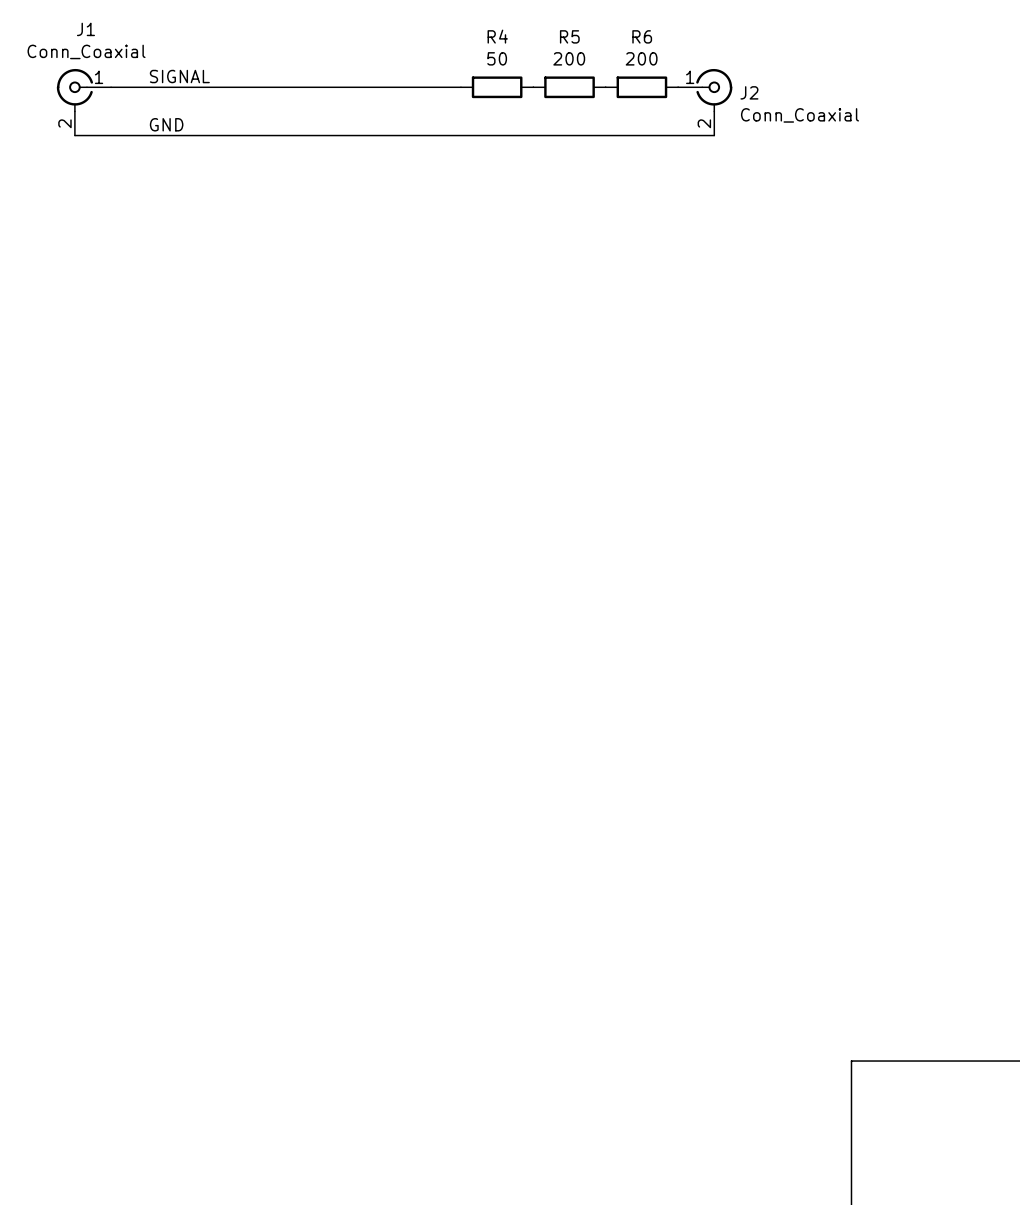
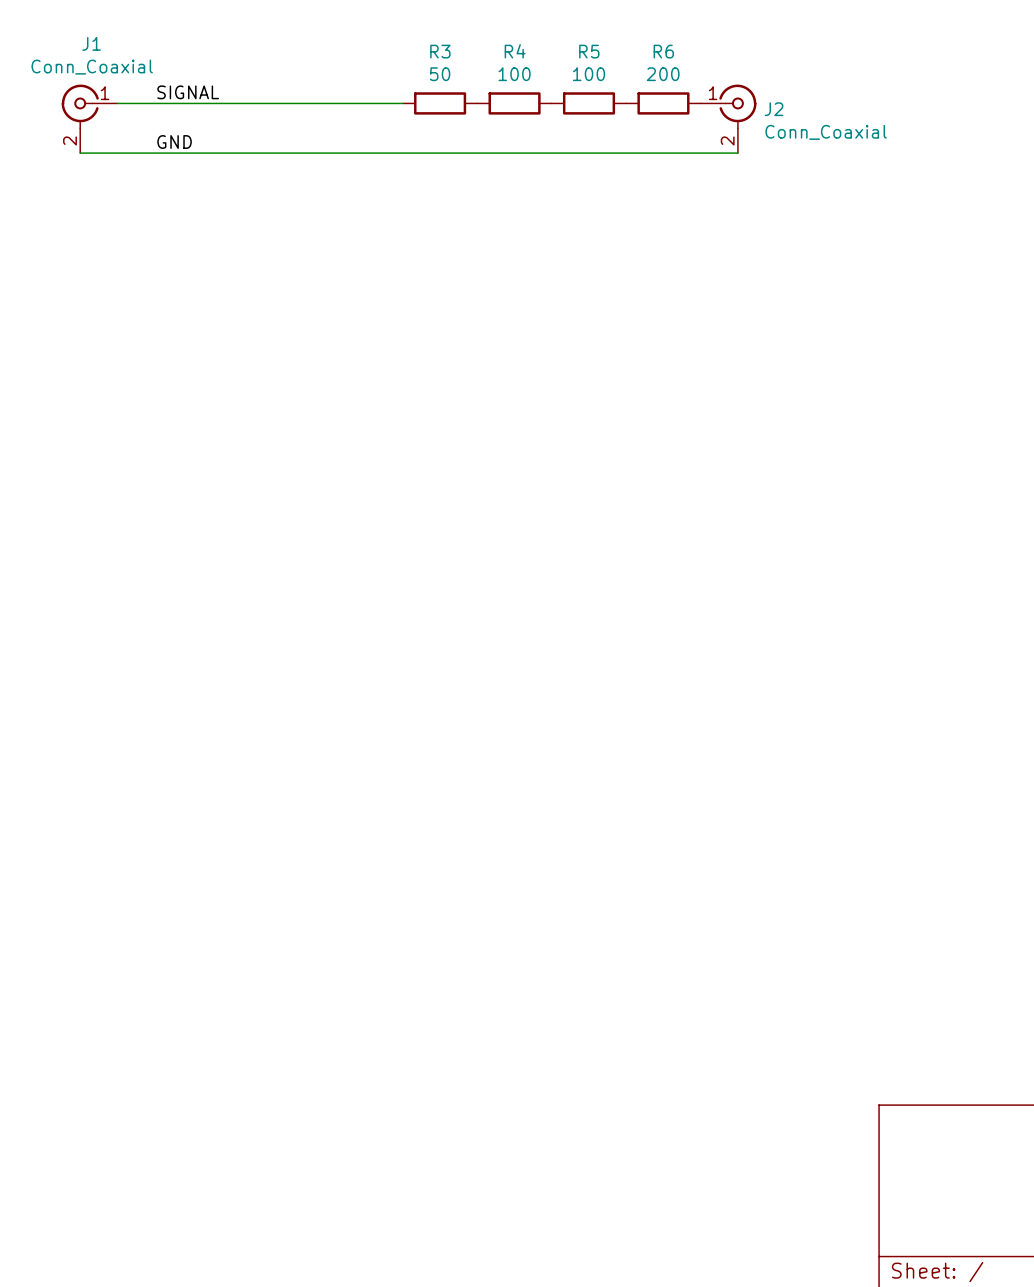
R4 value: 50 (497, 58) -> 100 (514, 74)
R5 value: 200 (569, 58) -> 100 (589, 74)
wire: (388, 87) (460, 87) -> none
R3: none -> 50 (440, 103)

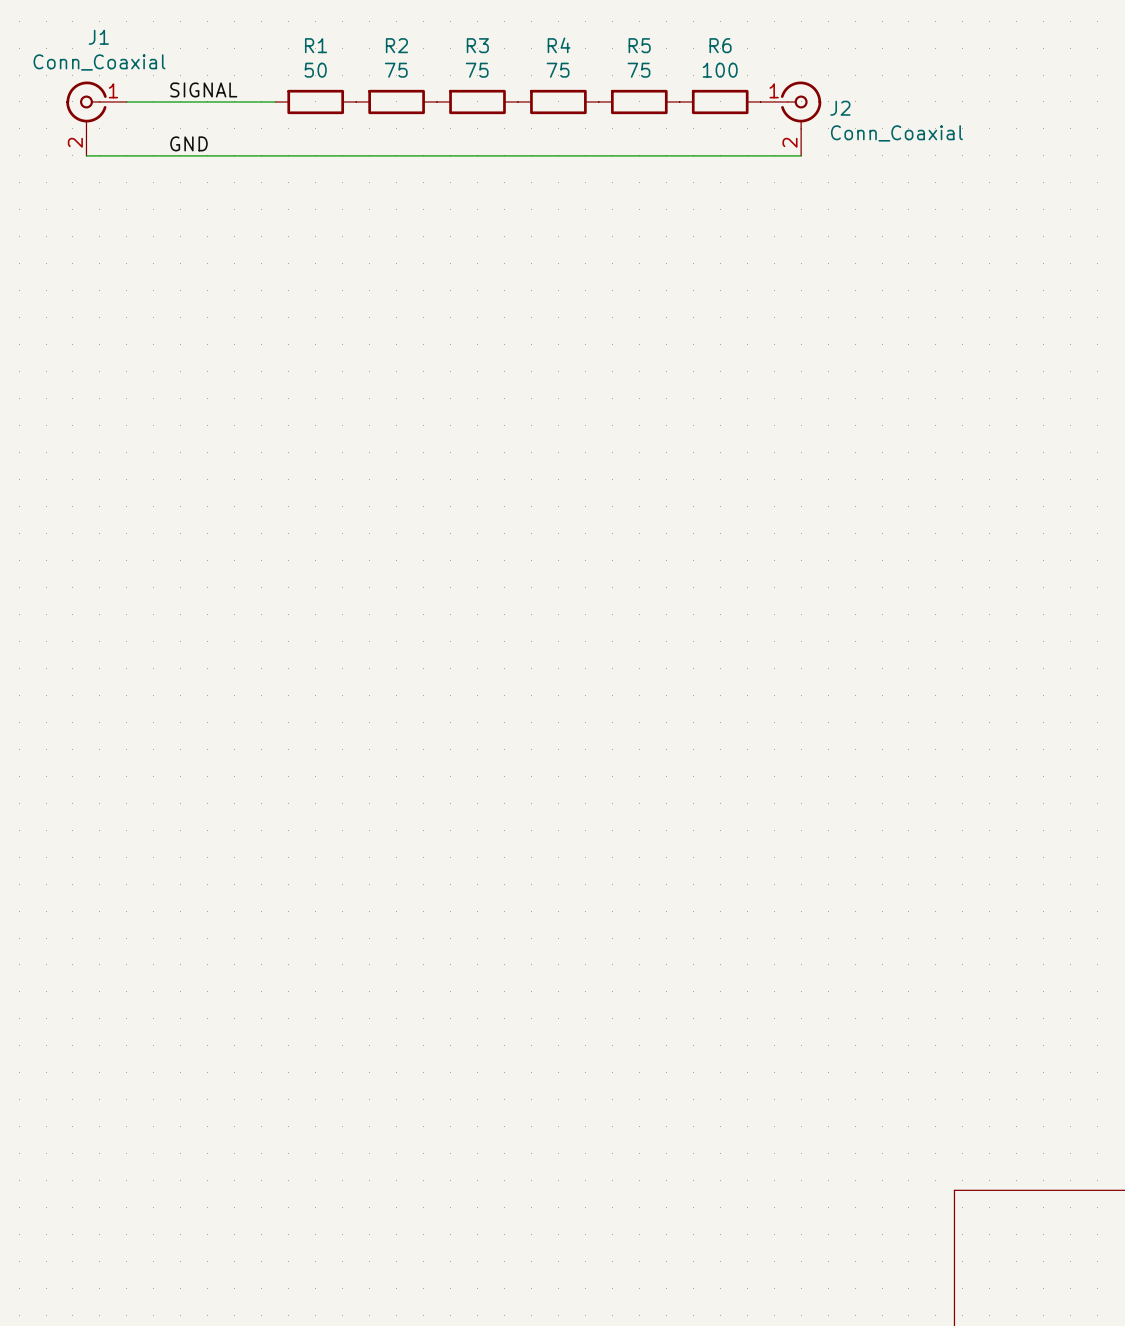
R3 value: 50 (440, 74) -> 75 (477, 70)
R4 value: 100 (514, 74) -> 75 (558, 70)
R5 value: 100 (589, 74) -> 75 (638, 70)
R6 value: 200 (663, 74) -> 100 (720, 70)
wire: (253, 103) (402, 103) -> none
R1: none -> 50 (315, 101)
R2: none -> 75 (396, 101)

